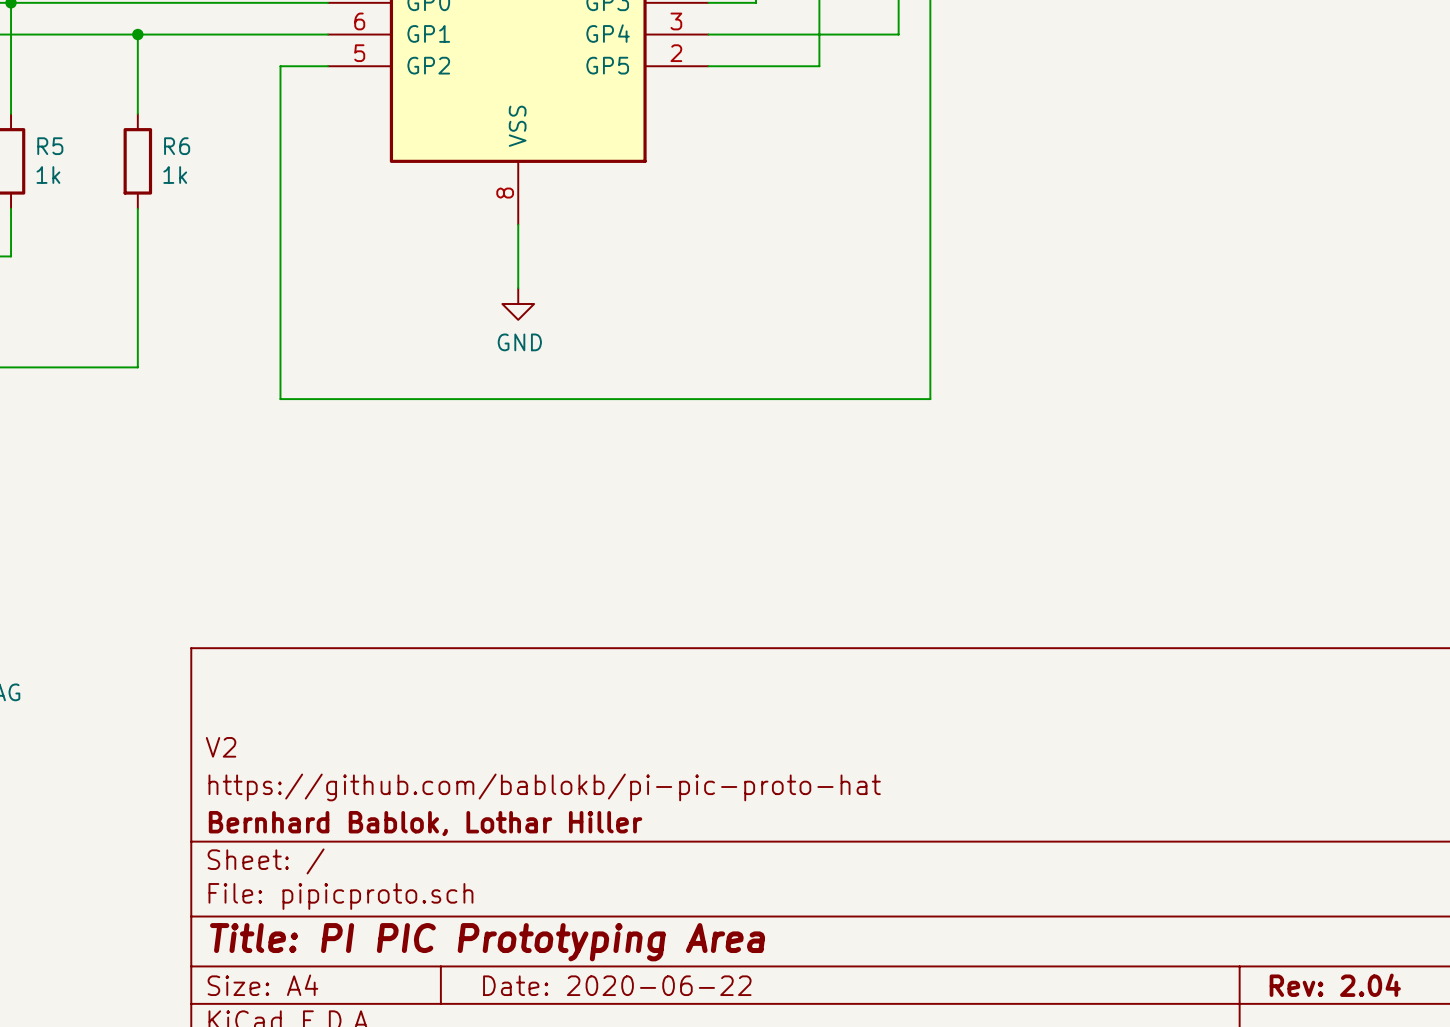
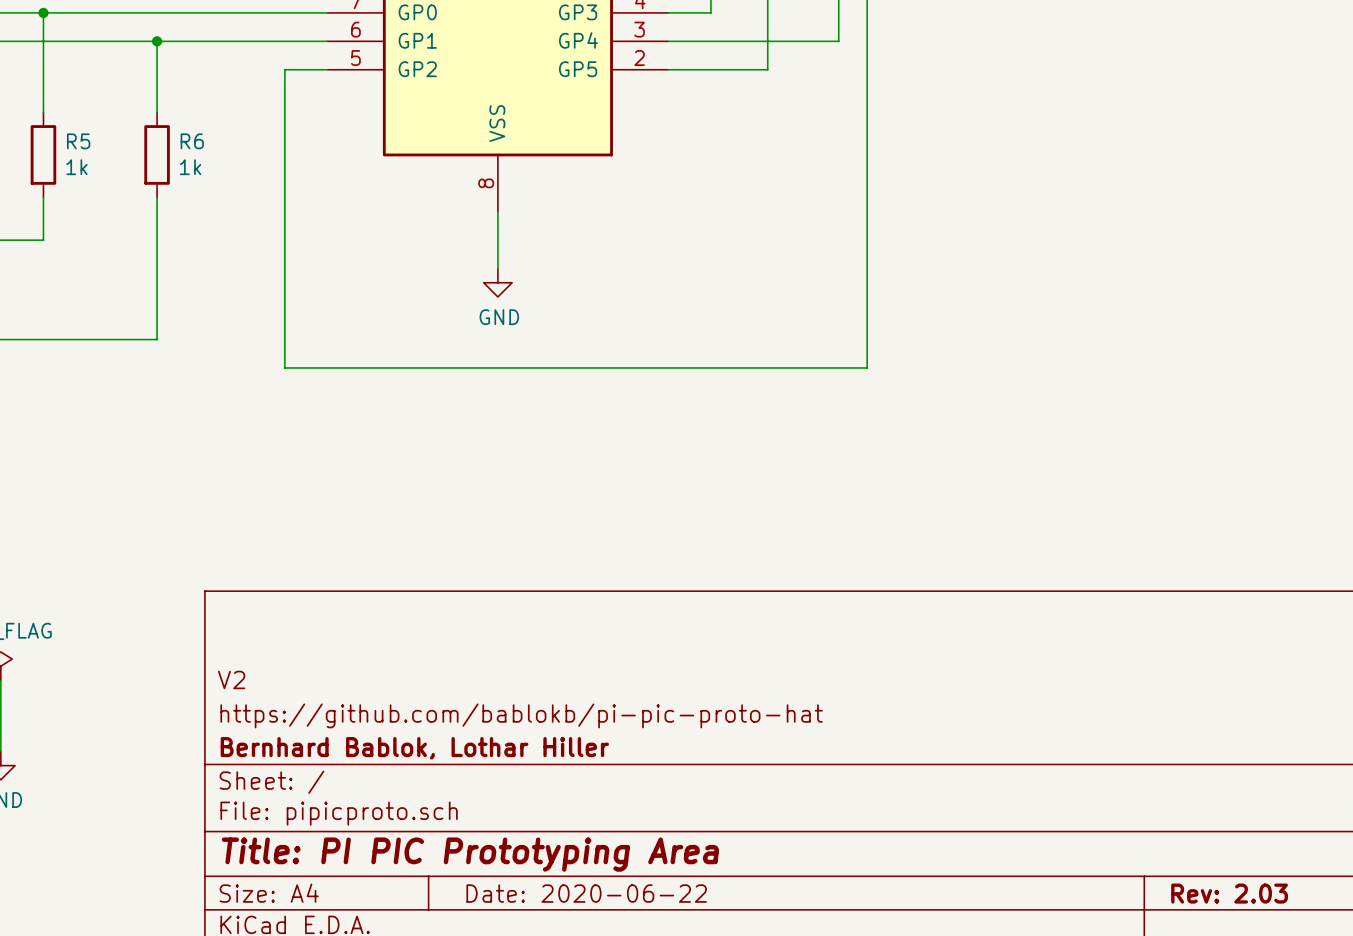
title block: Rev: 2.04 (1335, 985) -> Rev: 2.03 (1229, 893)

